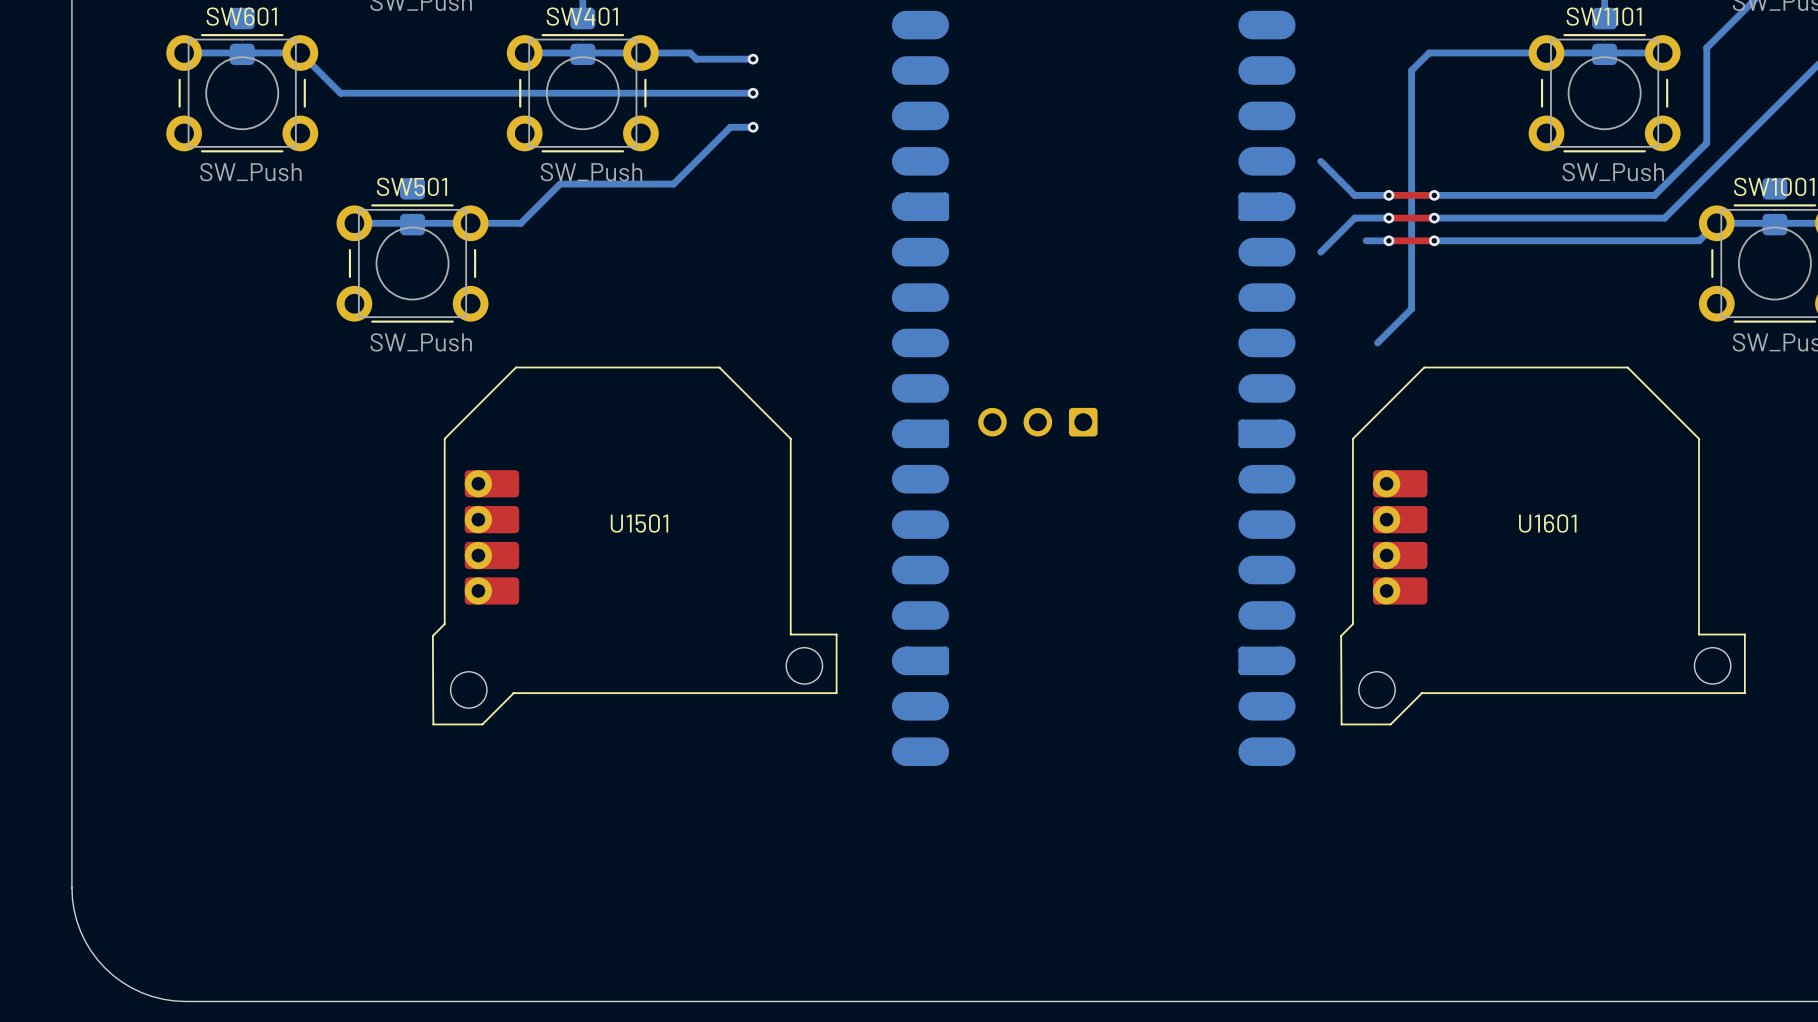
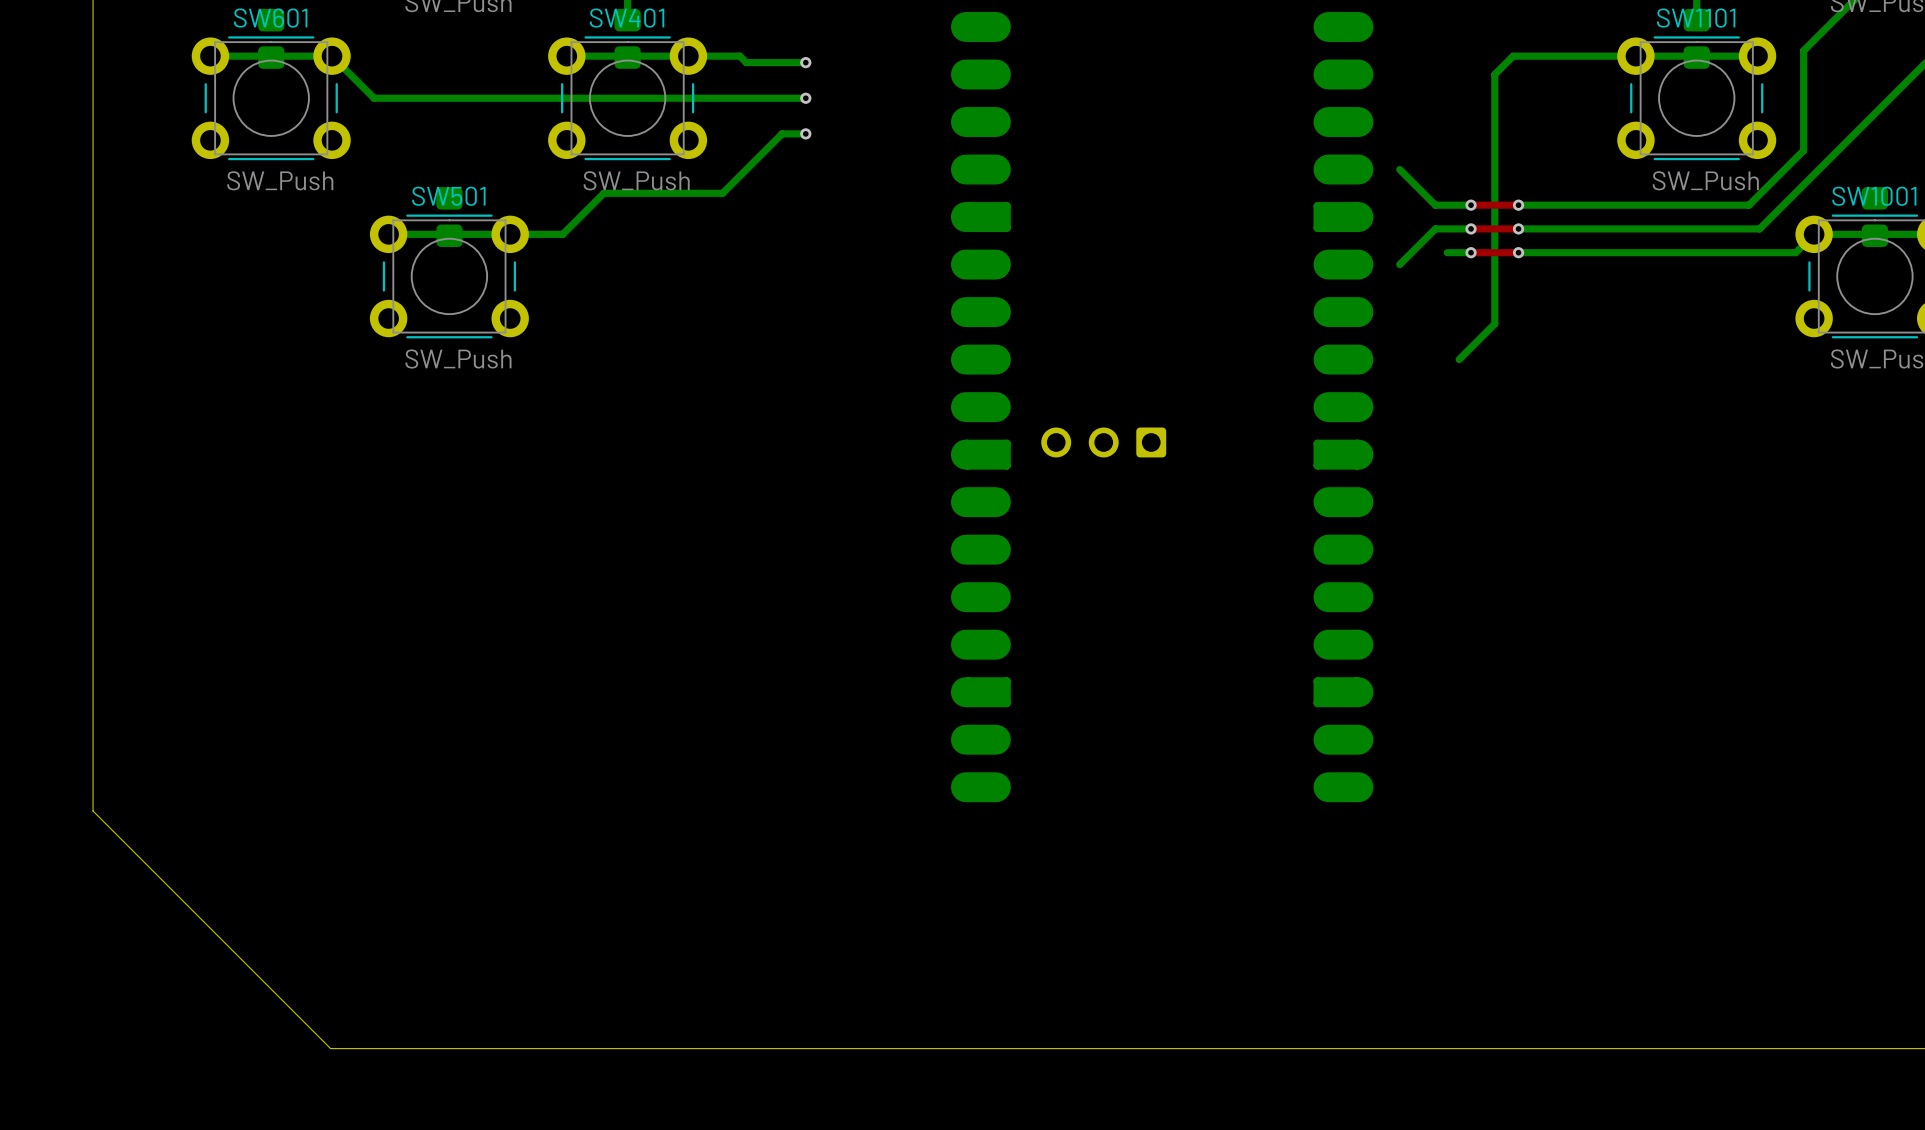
U1501: (634, 545) -> none
U1601: (1543, 545) -> none
board edge: (71, 774) (71, 887) (74, 910) (85, 941) (105, 968) (131, 988) (163, 999) (185, 1001) (299, 1001) -> (93, 811) (330, 1048)

